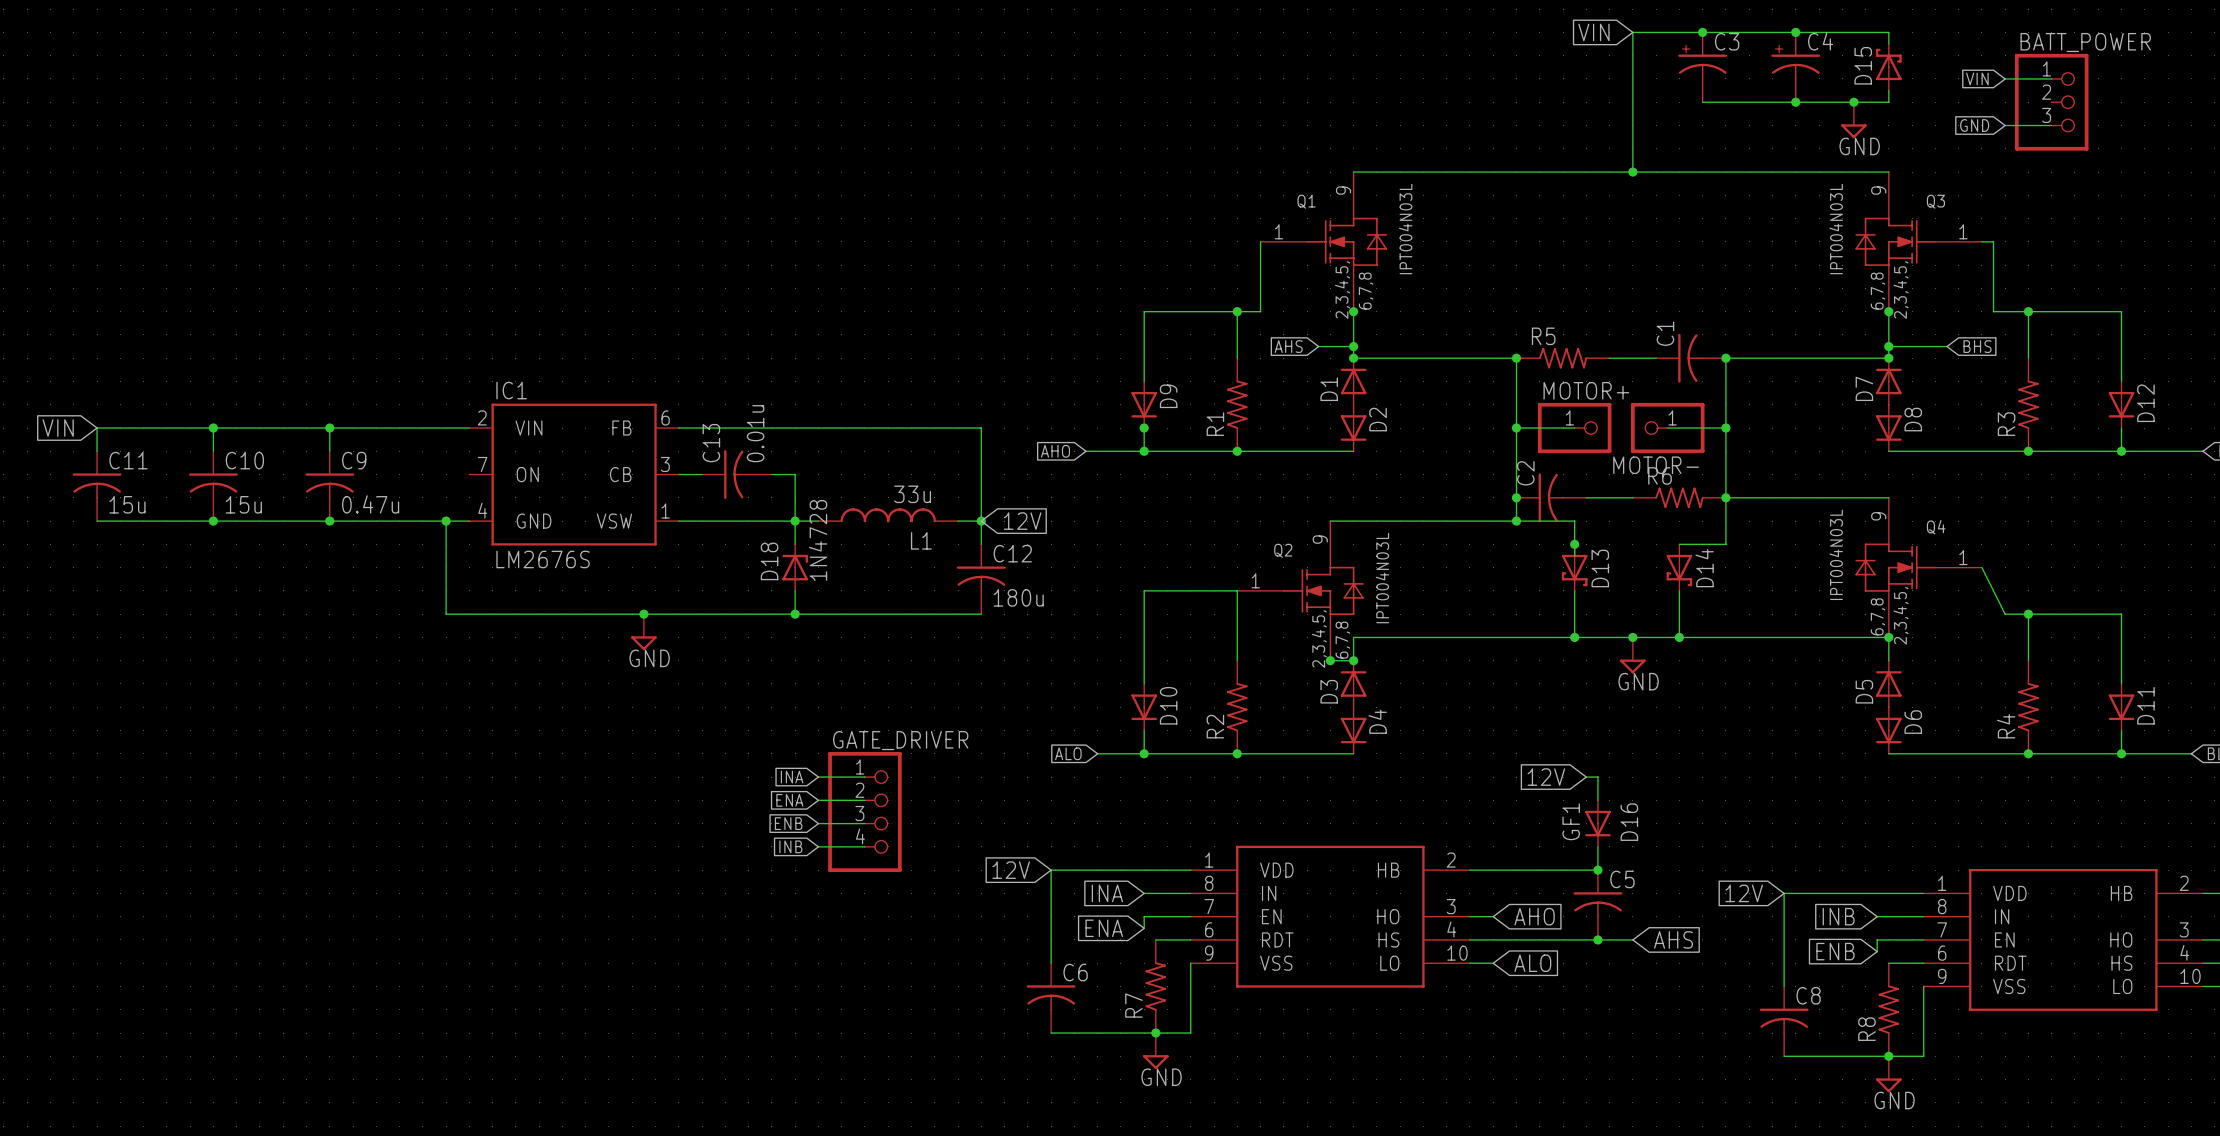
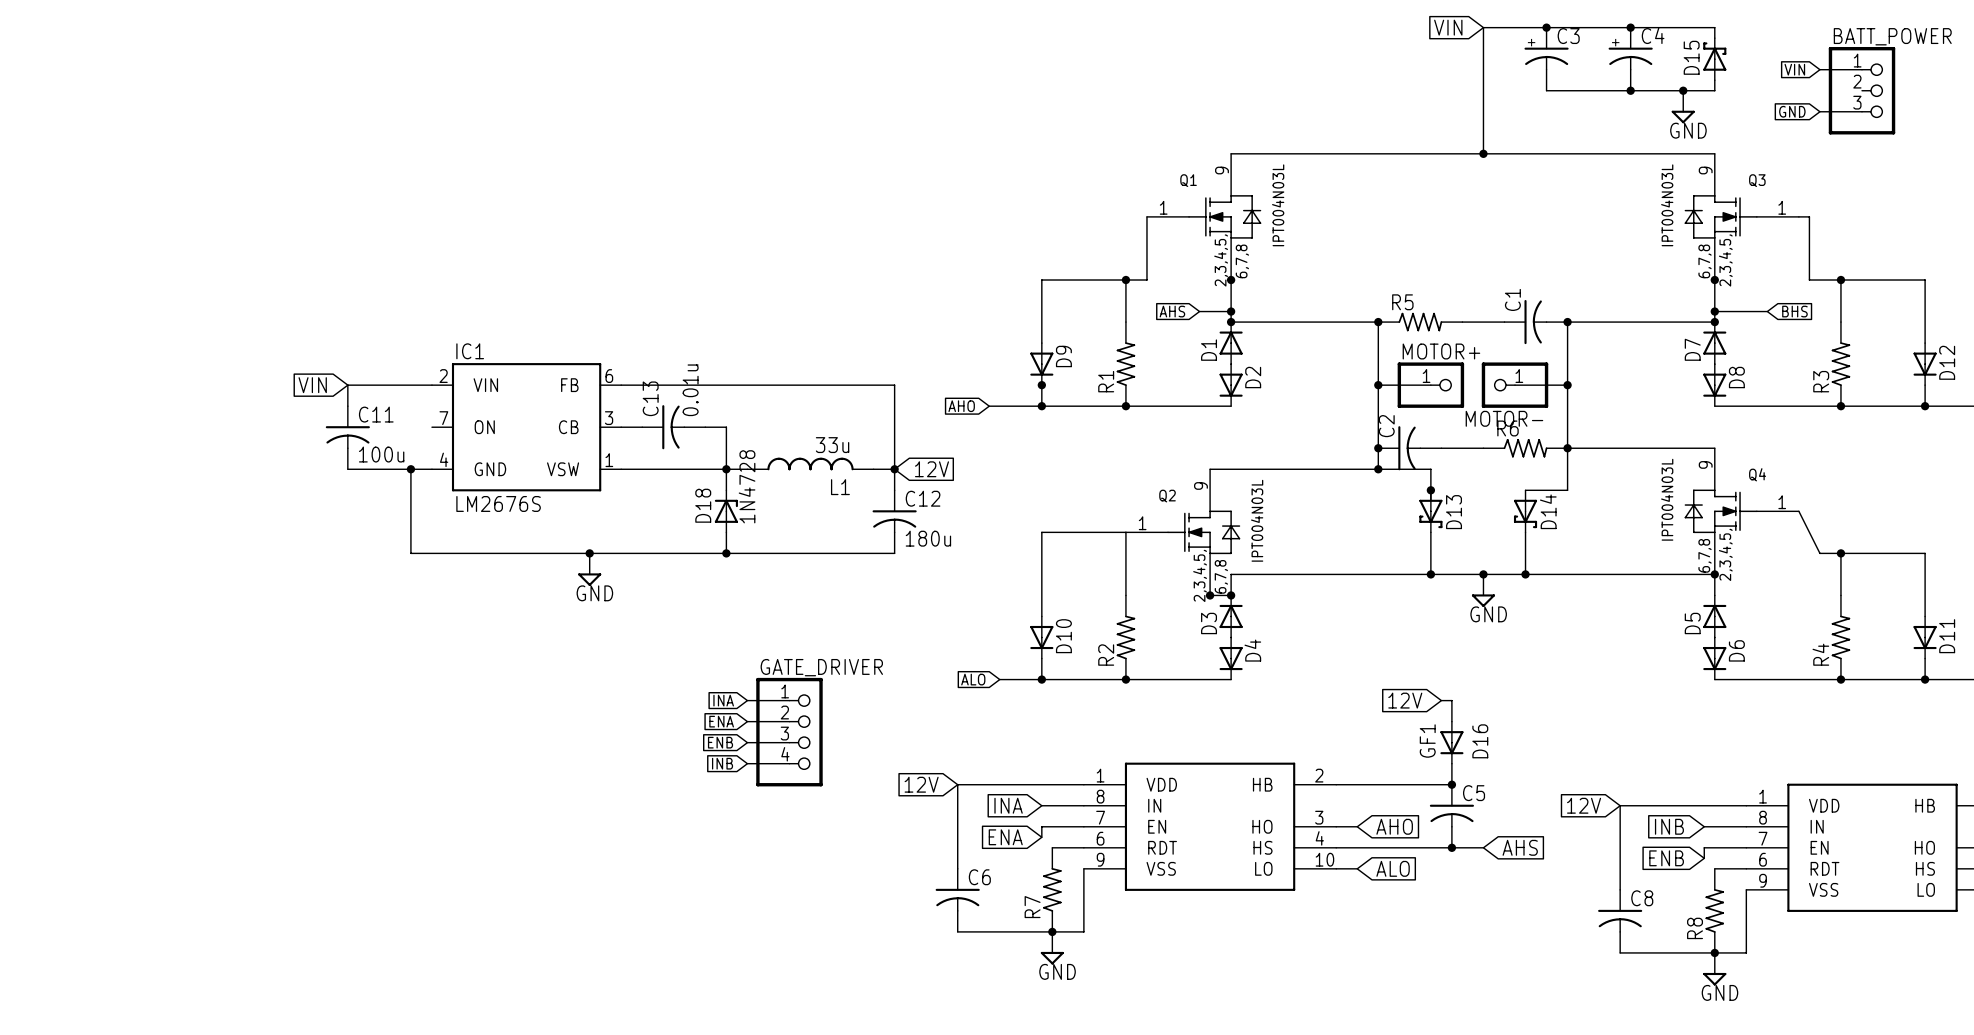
global label: VIN (58, 428) -> none
wire: (213, 428) (213, 451) -> none
junction: (213, 428) -> none
wire: (329, 428) (329, 451) -> none
junction: (329, 428) -> none
global label: none -> VIN (312, 385)
wire: (376, 428) (97, 428) (97, 451) -> (347, 385) (347, 406)
C11 position: (97, 486) -> (347, 437)
C10: 15u (213, 486) -> none
C9: 0.47u (329, 486) -> none
C11 value: 15u (127, 504) -> 100u (381, 454)
wire: (97, 521) (376, 521) -> none
junction: (213, 521) -> none
junction: (329, 521) -> none

